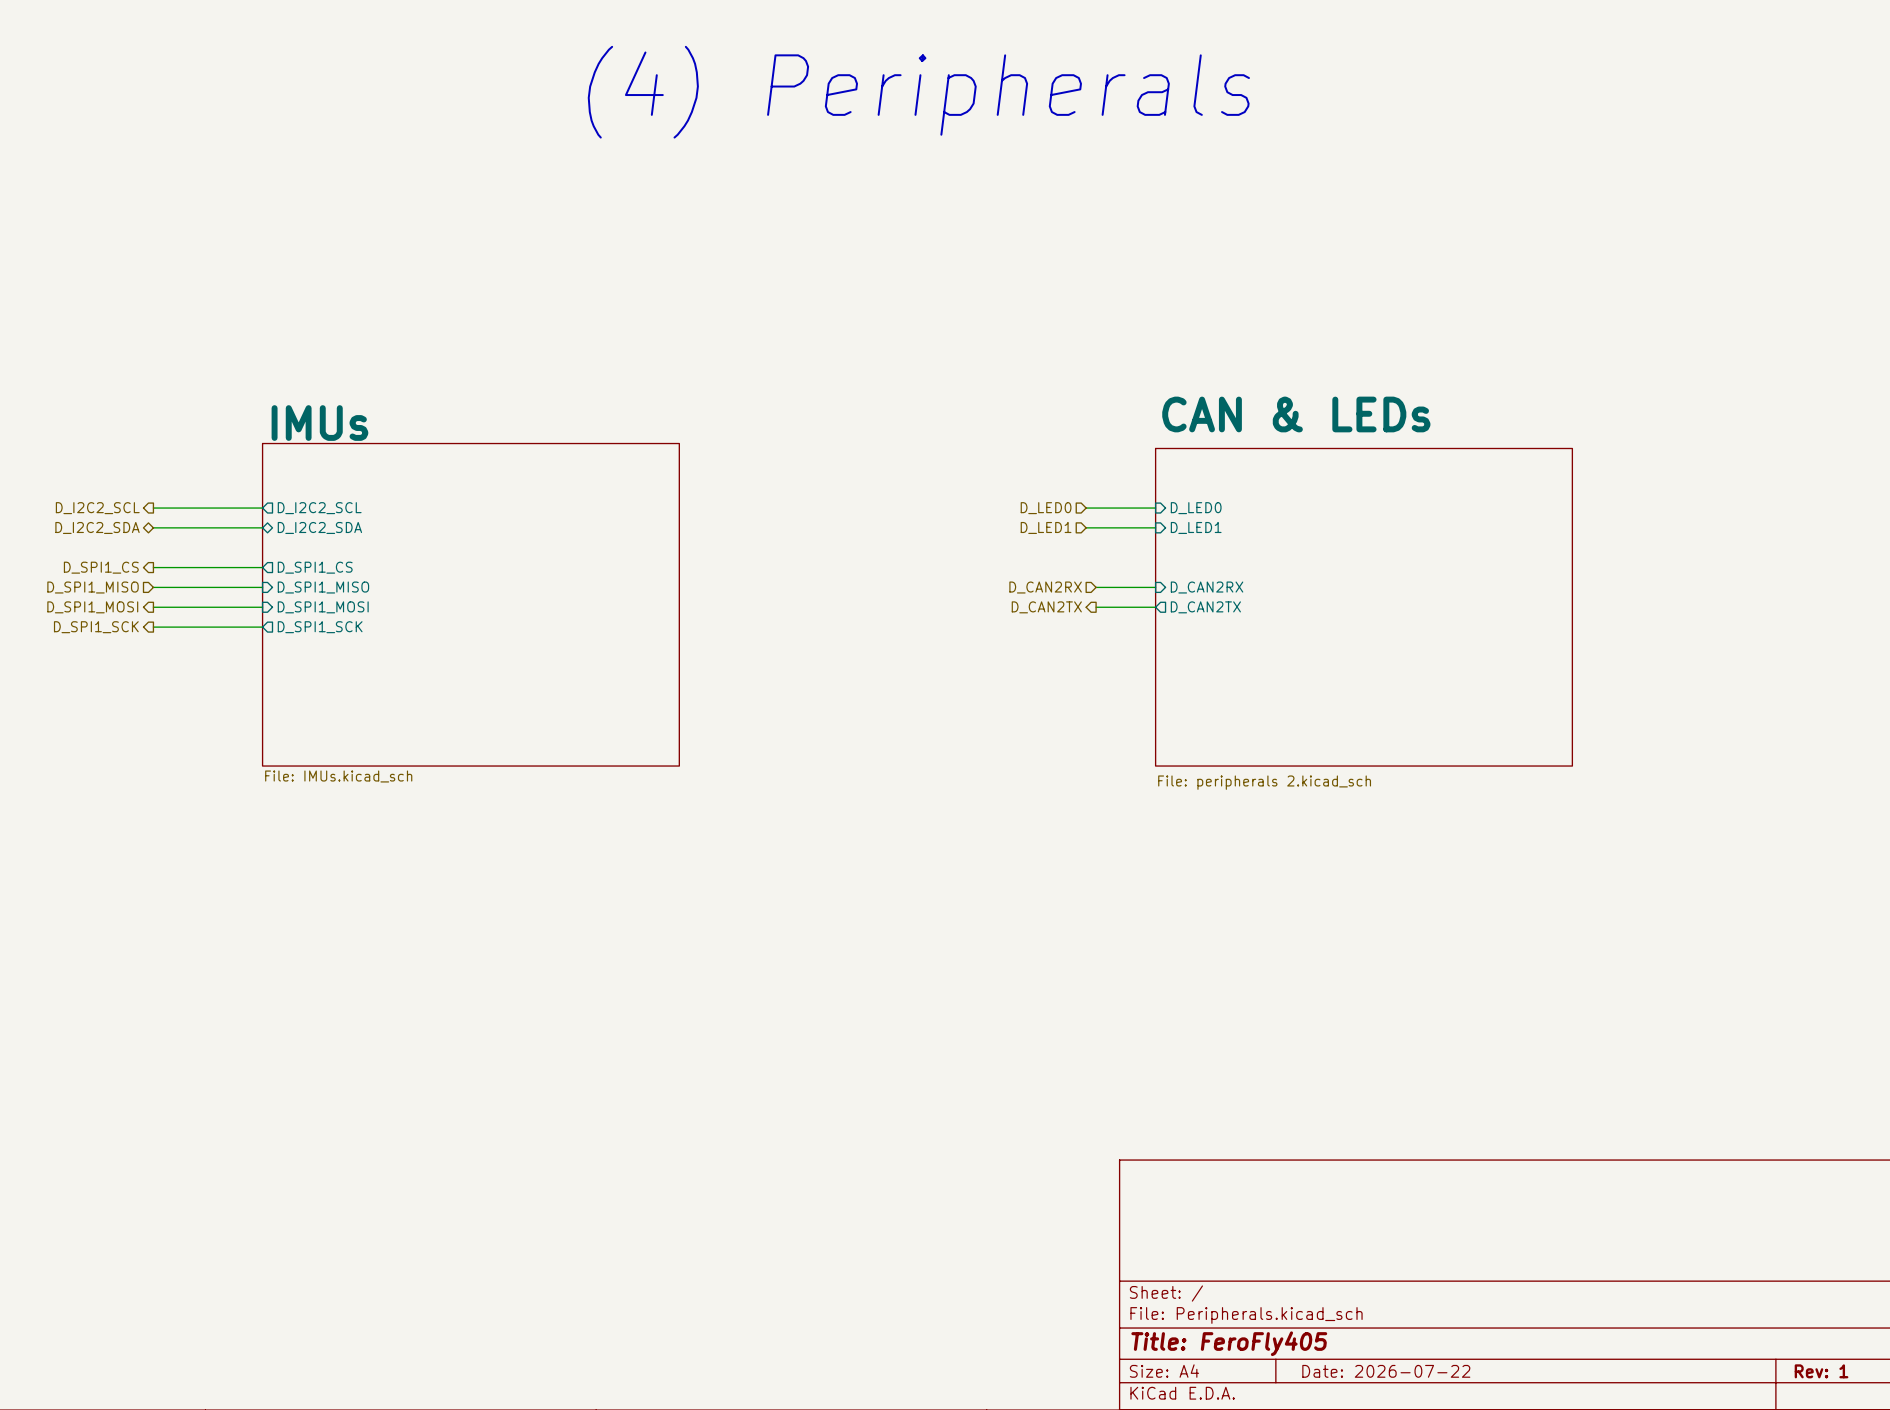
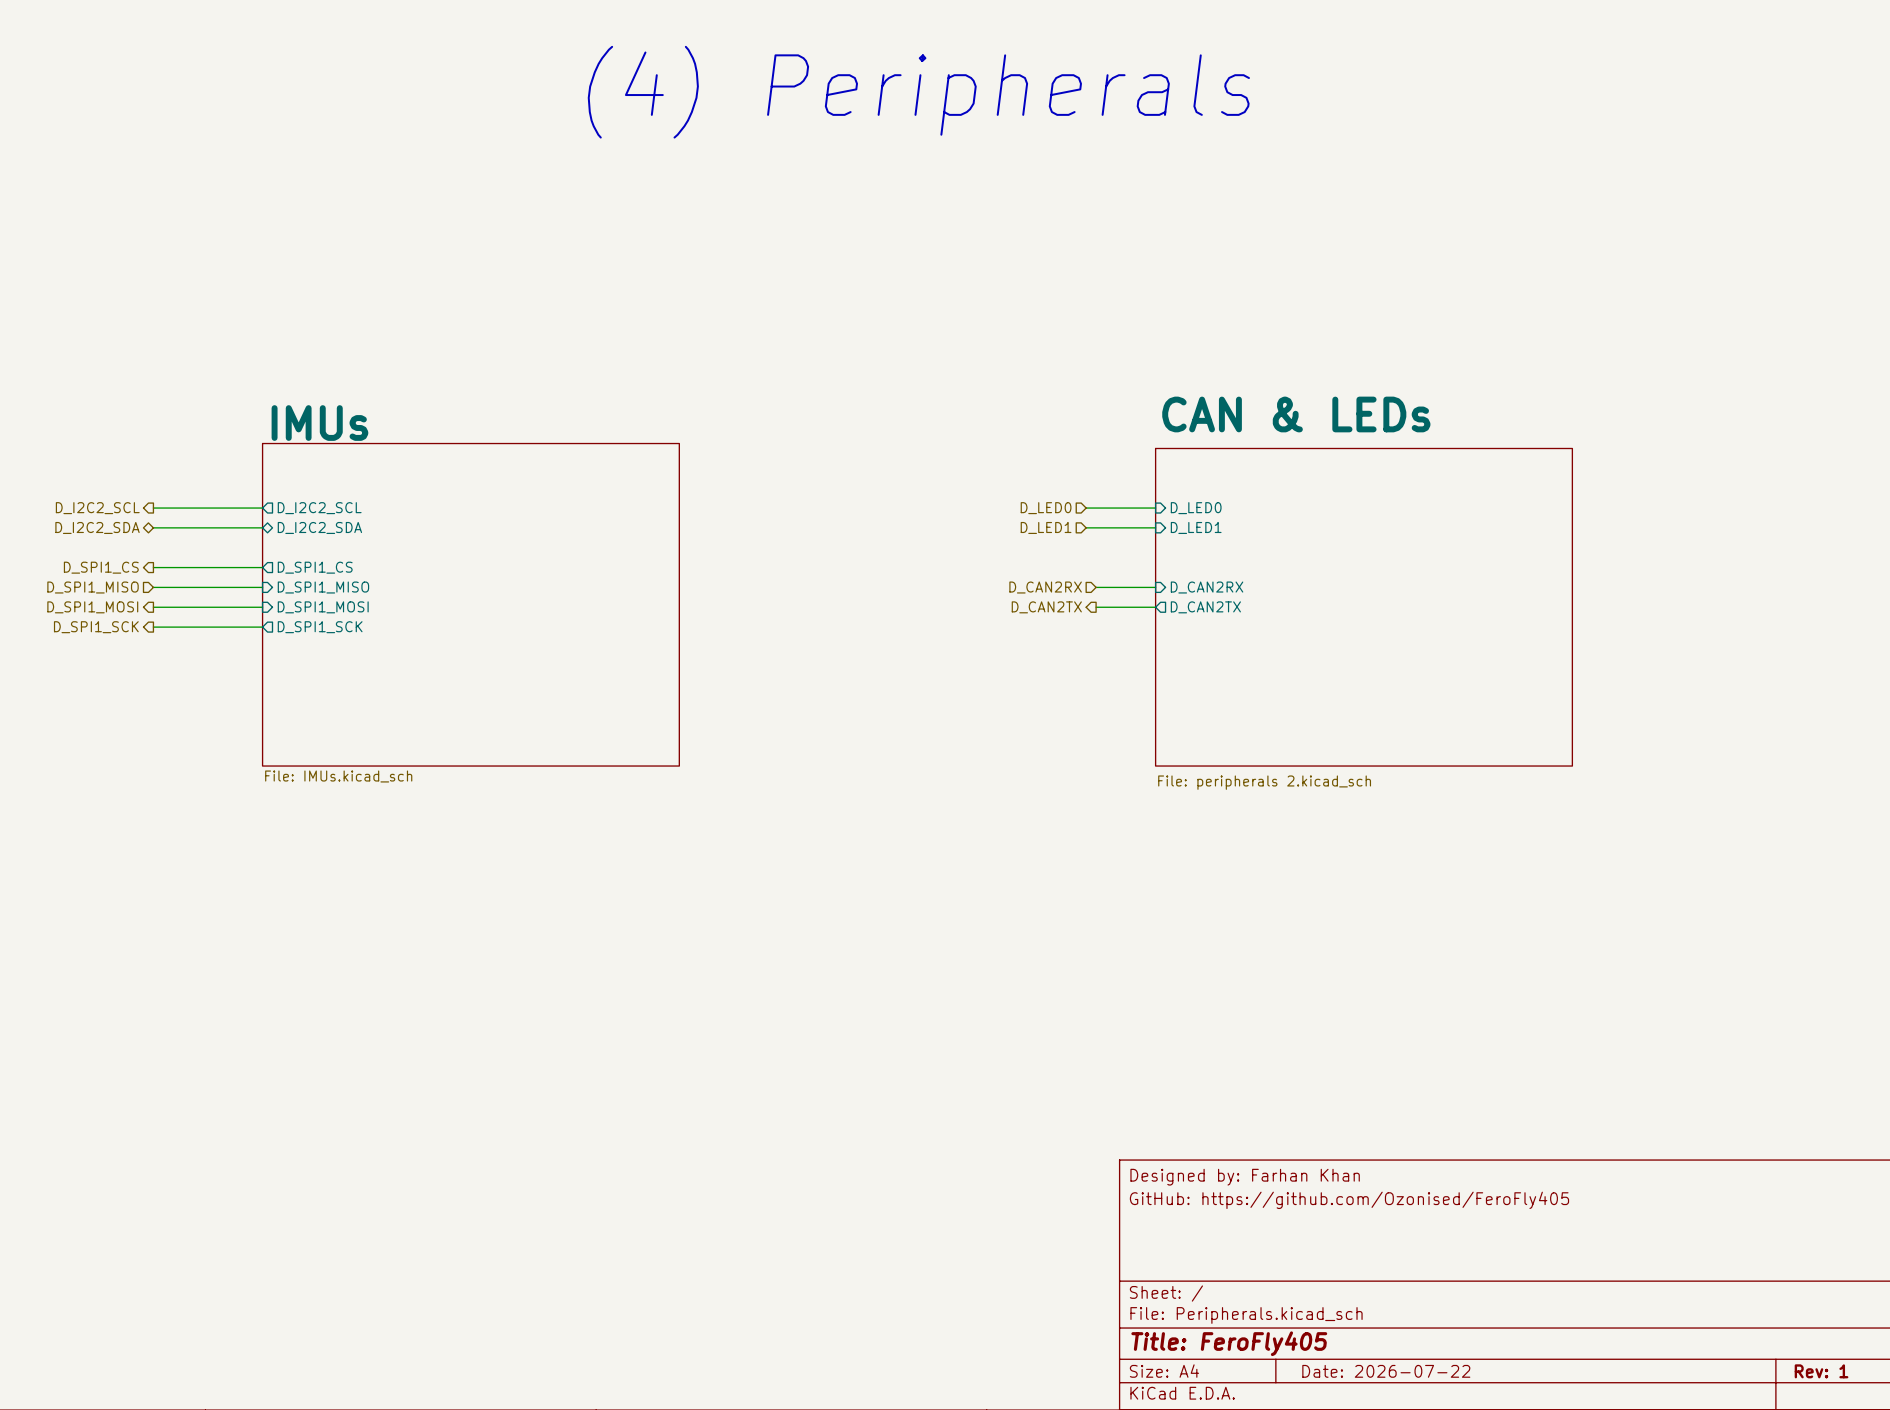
title block: none -> Designed by: Farhan Khan (1245, 1177)
title block: none -> GitHub: https://github.com/Ozonised/FeroFly405 (1349, 1200)

